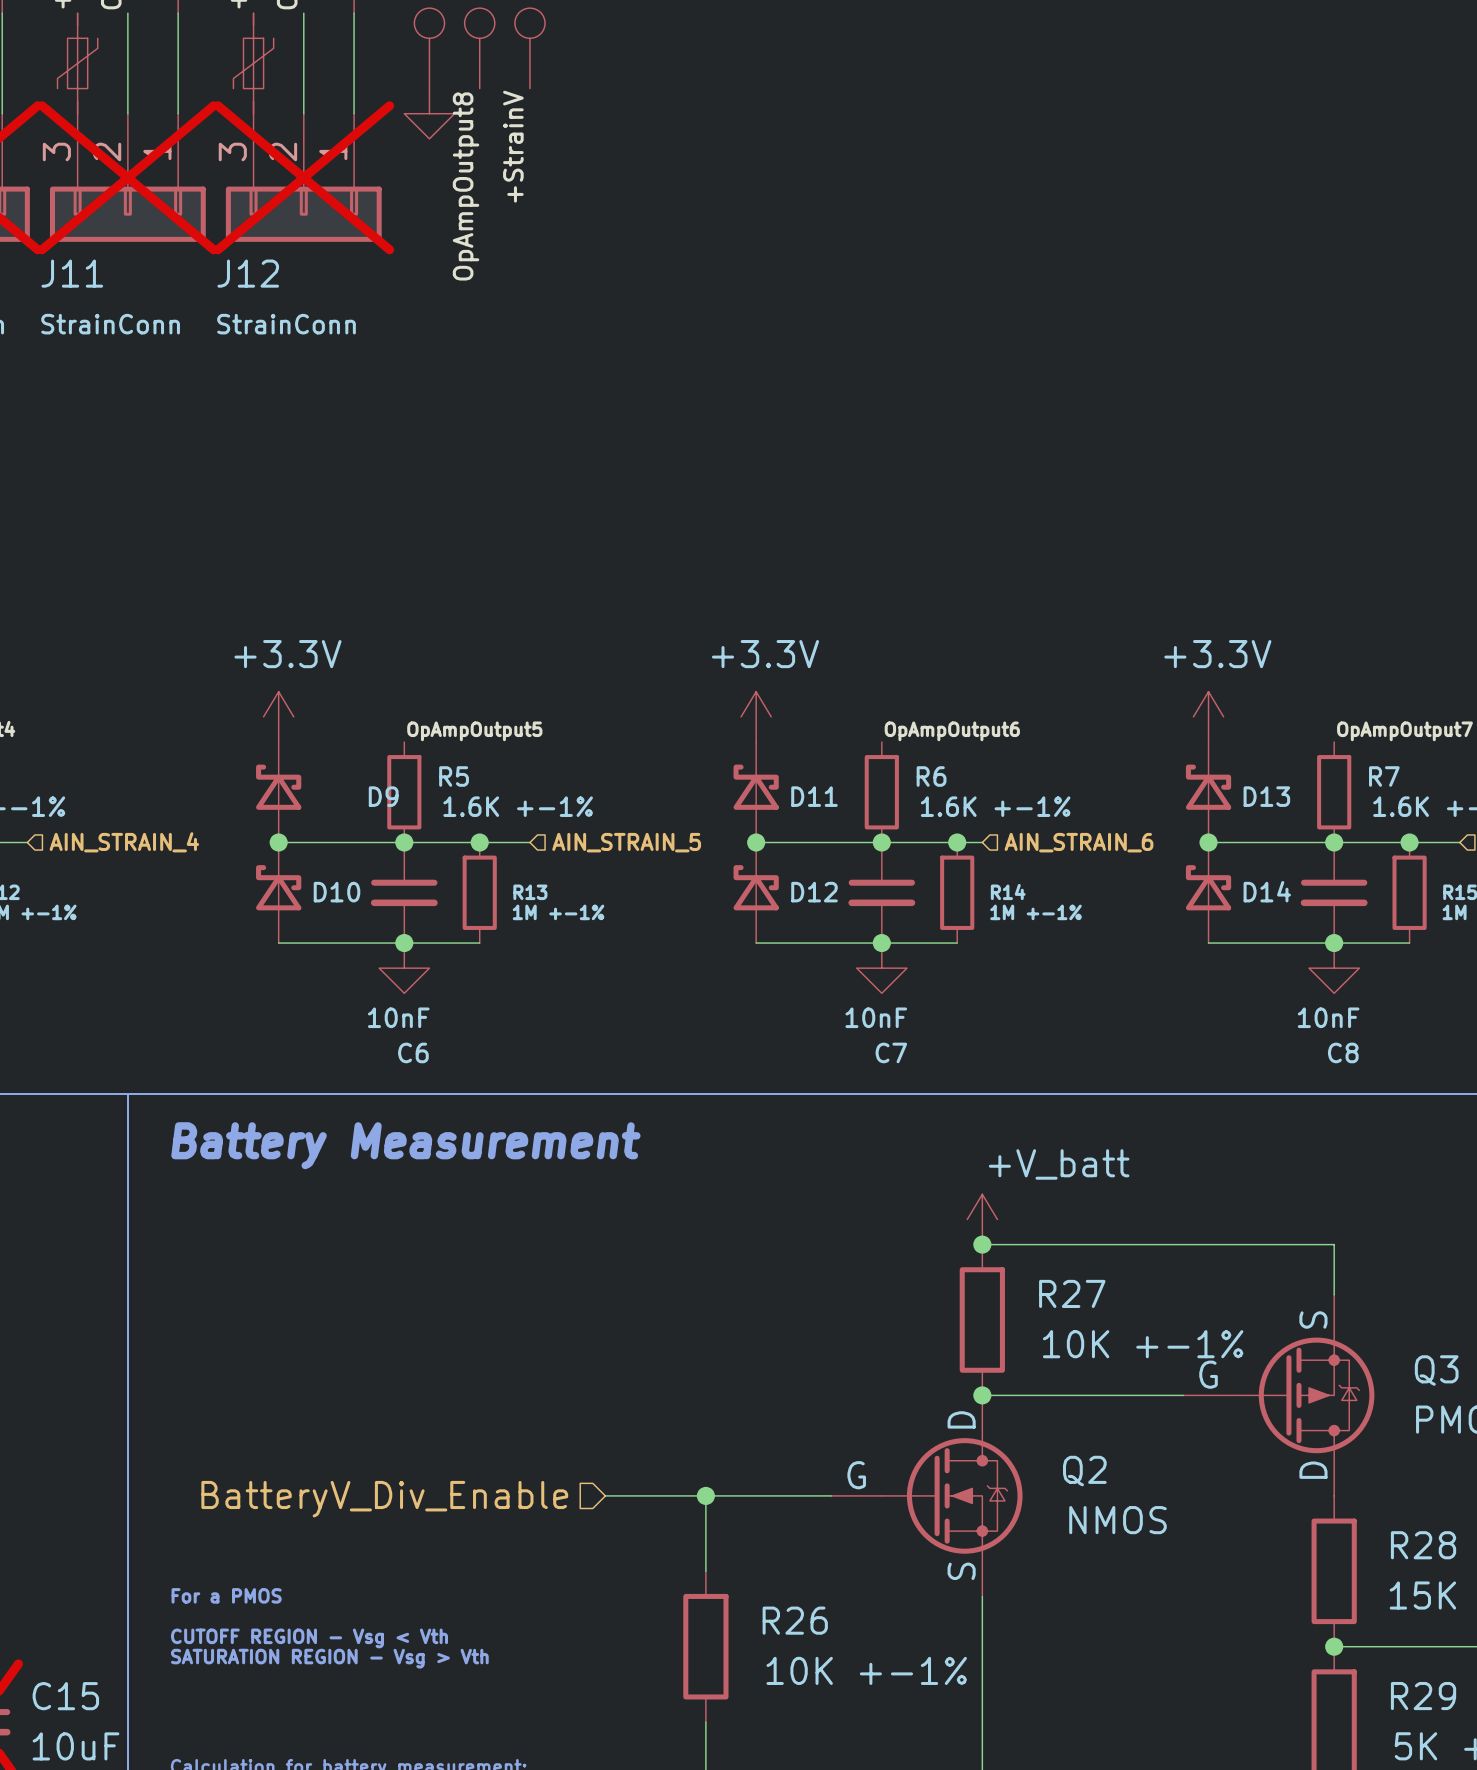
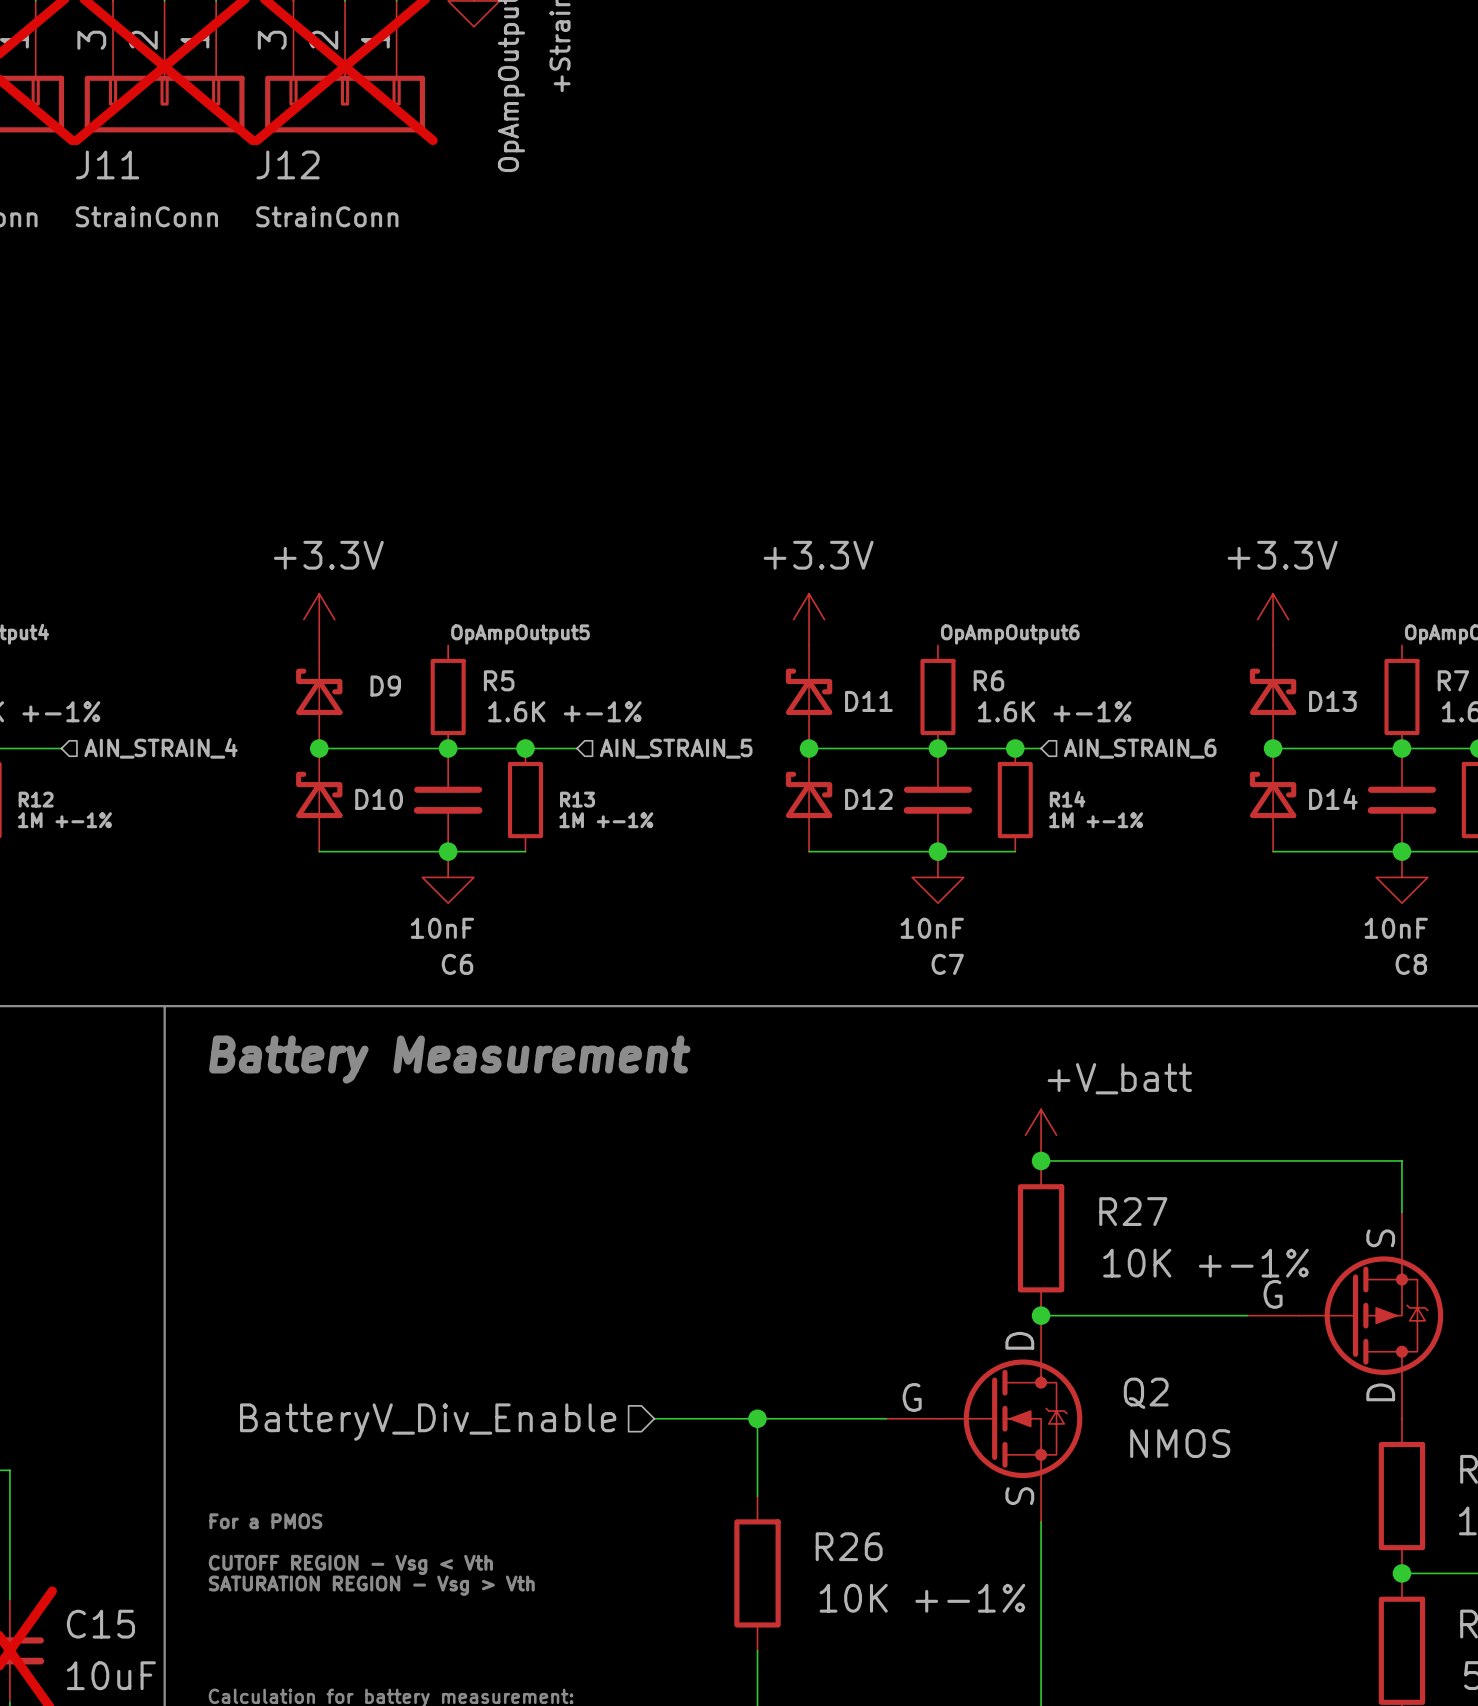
D9 name position: D9 (383, 796) -> D9 (385, 685)

